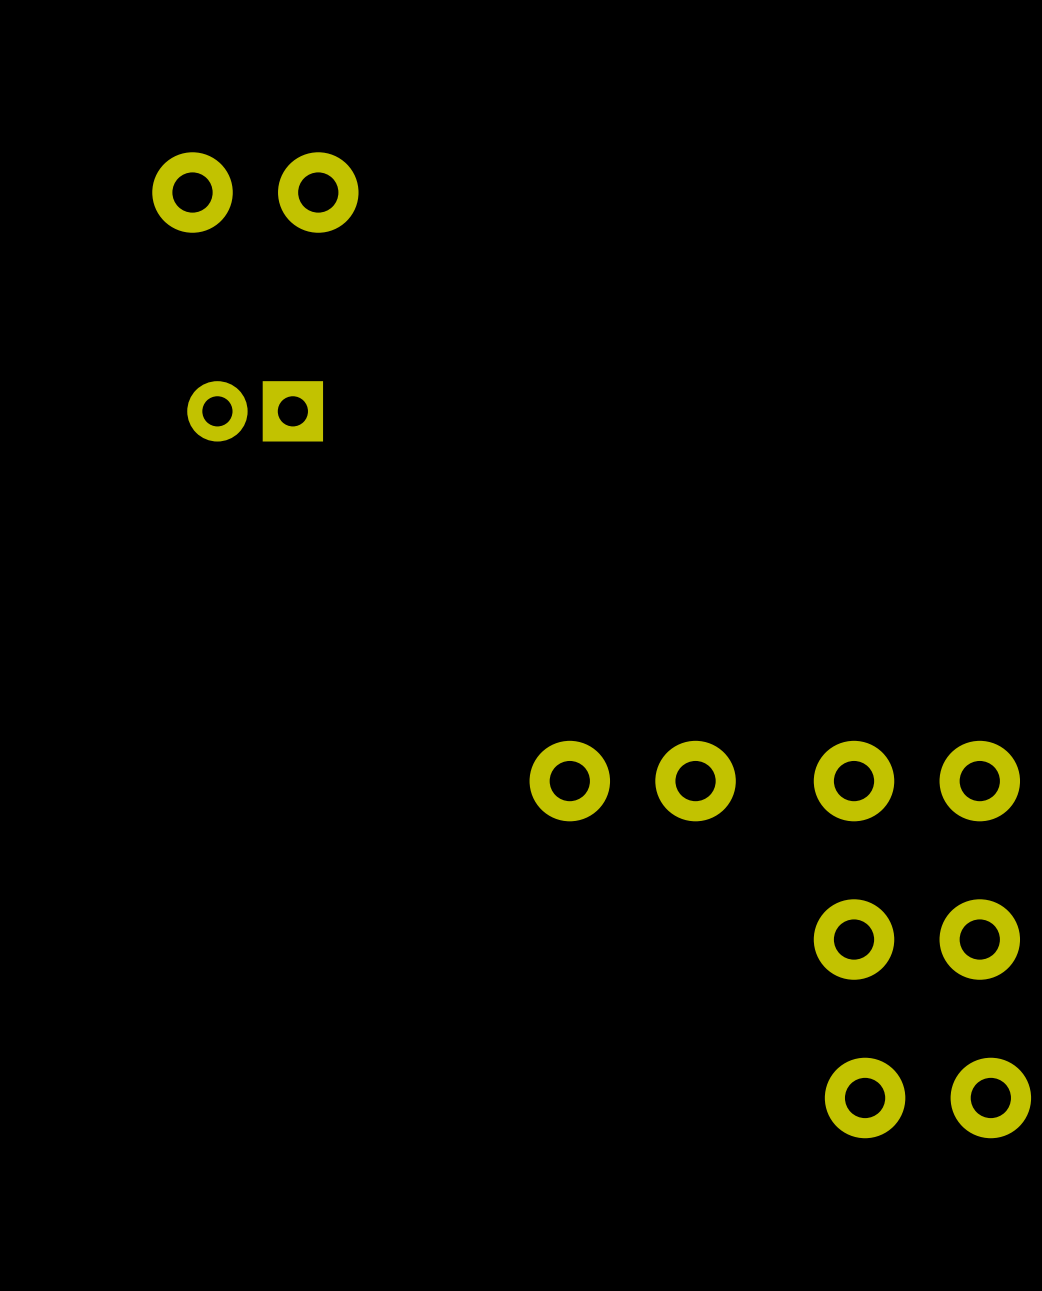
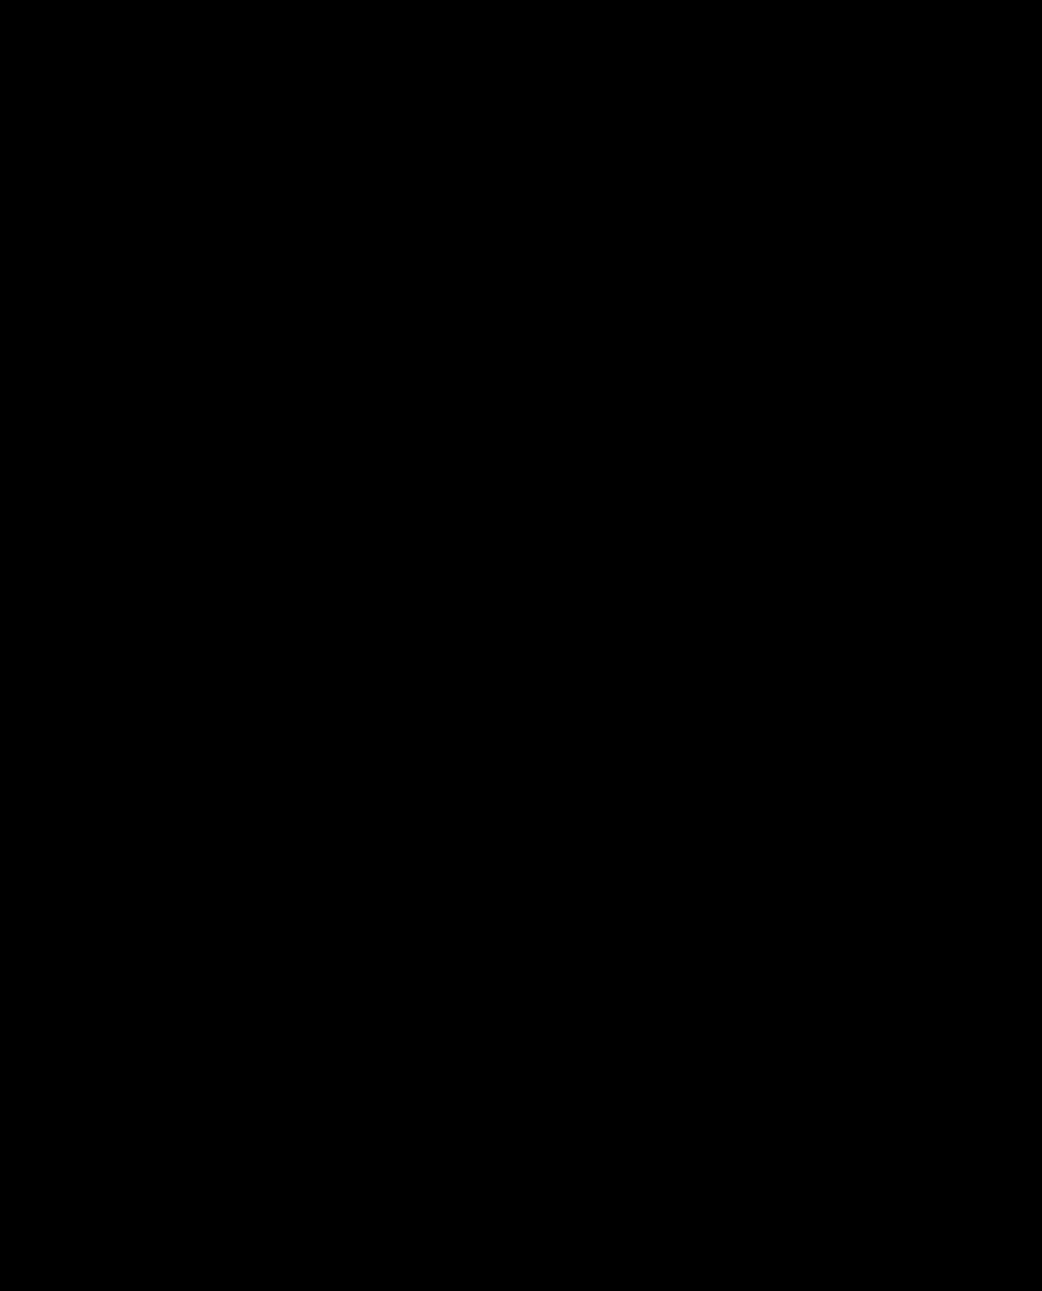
part: (255, 192) -> none
part: (255, 411) -> none
part: (632, 781) -> none
part: (916, 781) -> none
part: (916, 939) -> none
part: (927, 1097) -> none

